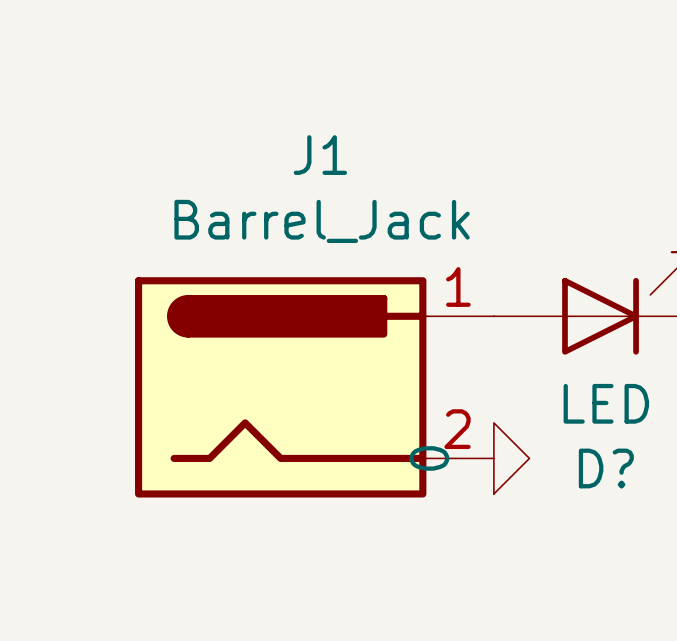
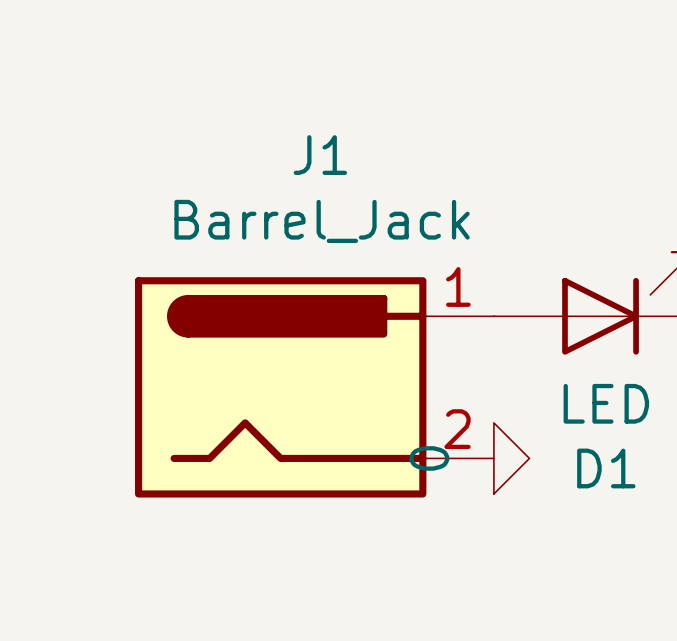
D? name: D? (606, 468) -> D1 (606, 468)

